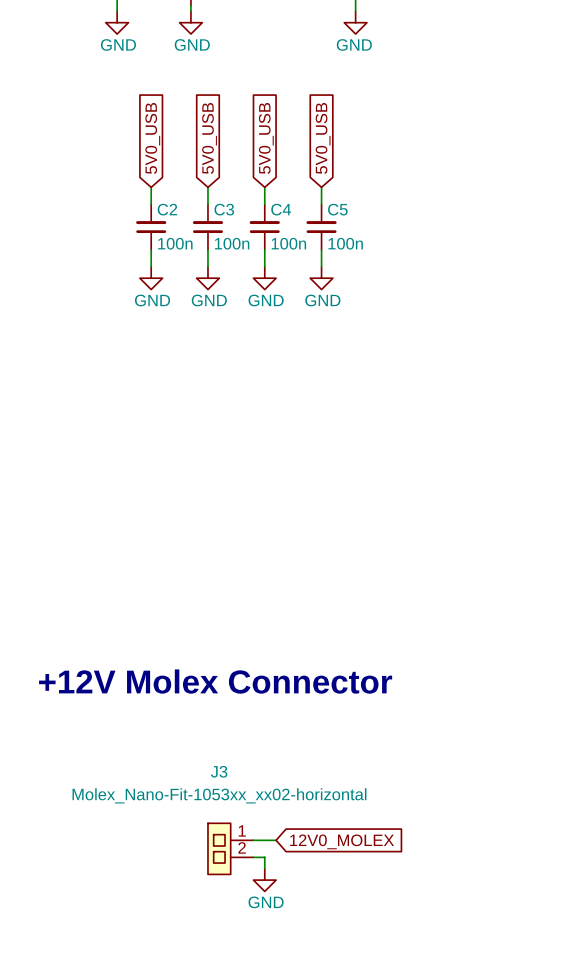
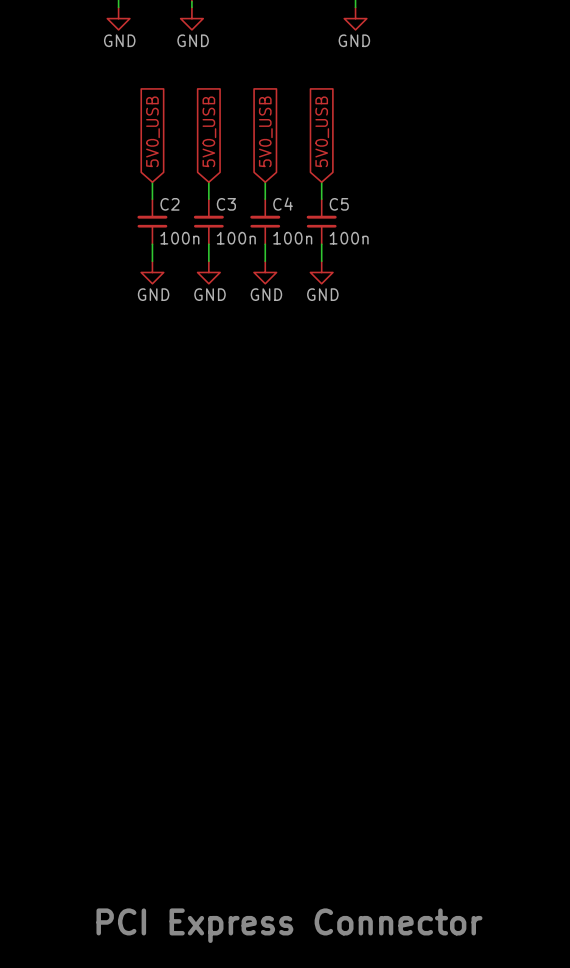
text: +12V Molex Connector (215, 681) -> none
wire: (253, 840) (276, 840) -> none
global label: 12V0_MOLEX (342, 841) -> none
J3: Molex_Nano-Fit-1053xx_xx02-horizontal (230, 848) -> none
wire: (253, 857) (264, 857) (264, 868) -> none
power symbol: GND (264, 880) -> none
text: none -> PCI Express Connector (289, 925)

